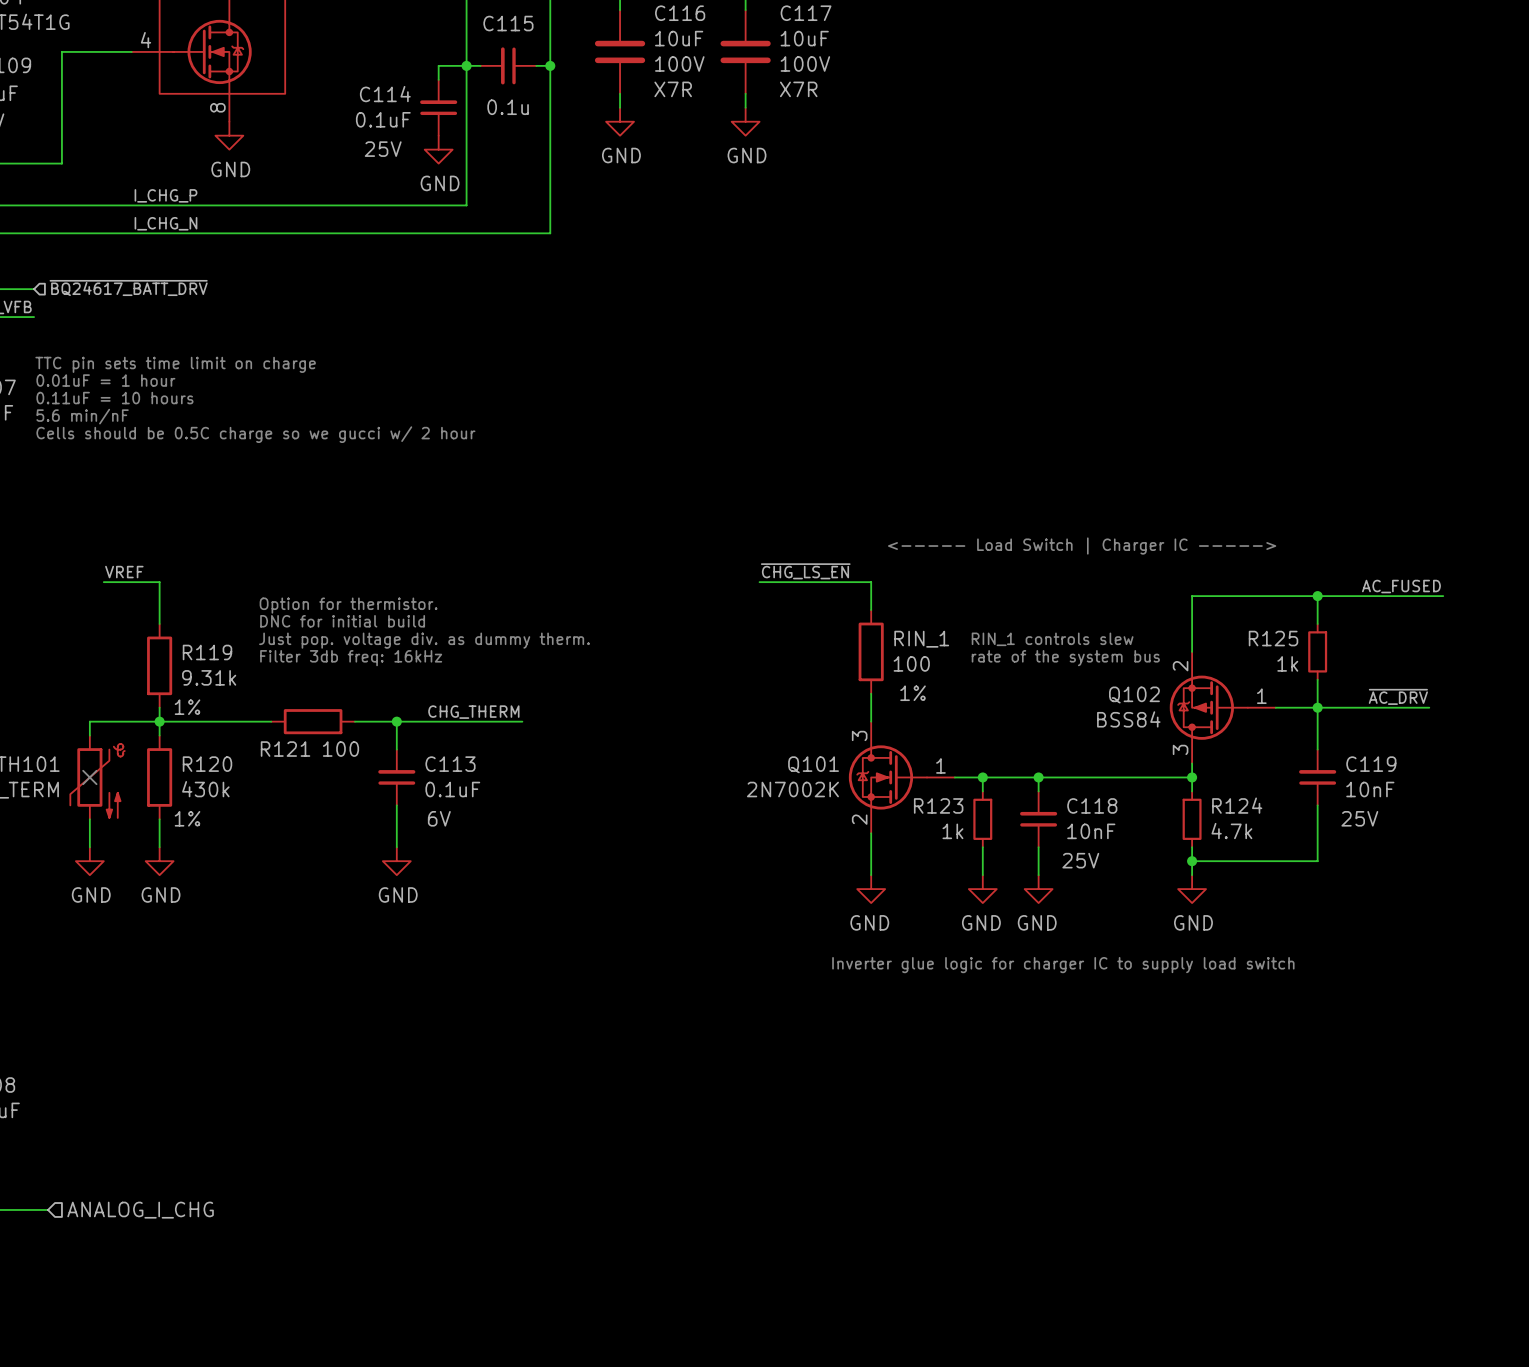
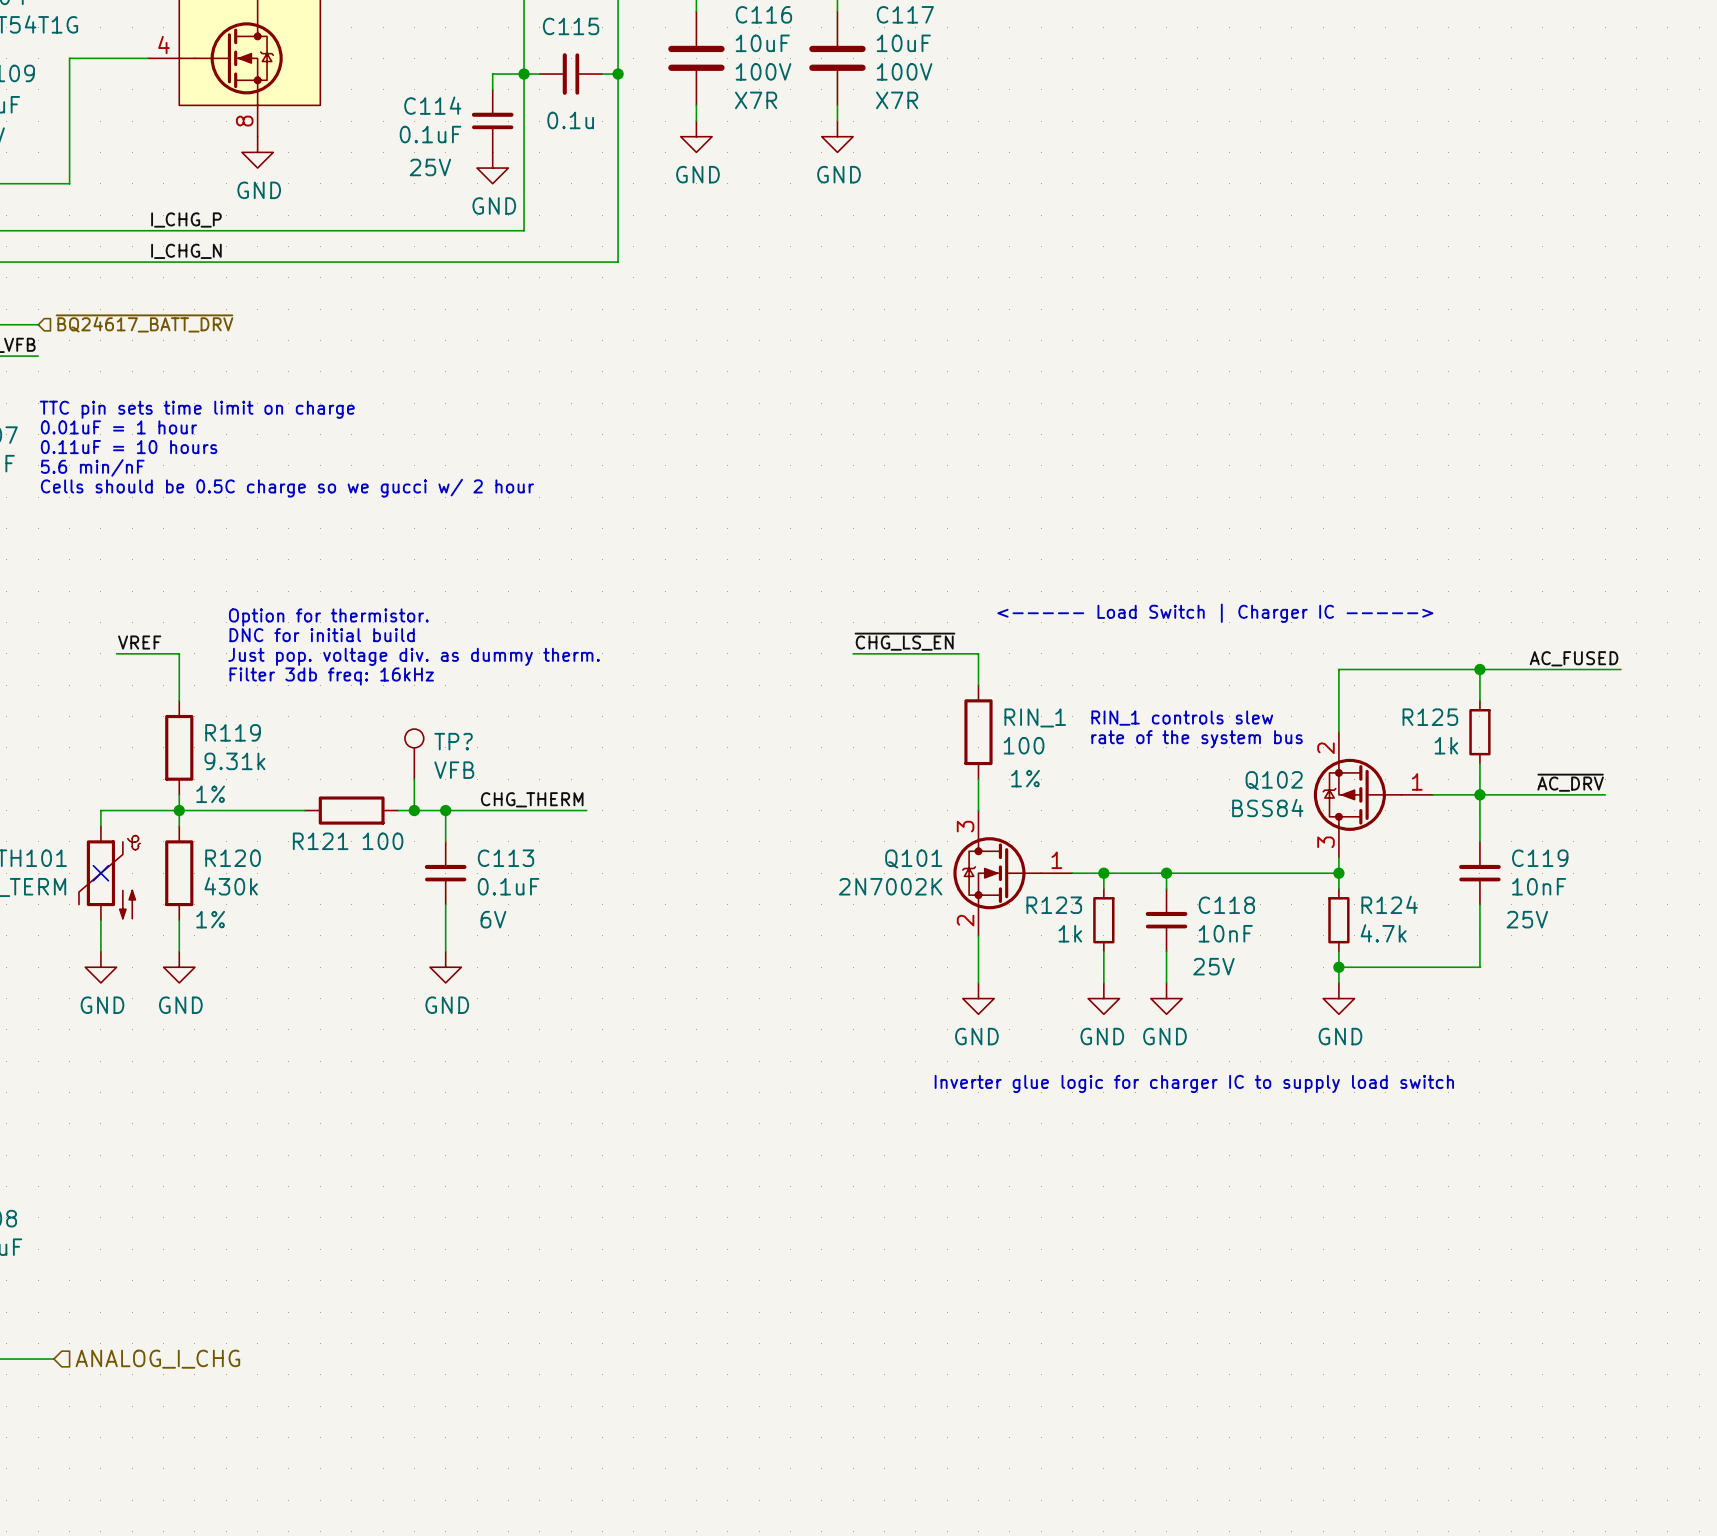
text position: Option for thermistor. (348, 605) -> Option for thermistor. (328, 617)
text position: DNC for initial build (342, 621) -> DNC for initial build (322, 635)
text position: Just pop. voltage div. as dummy therm. (424, 640) -> Just pop. voltage div. as dummy therm. (414, 656)
text position: Filter 3db freq: 16kHz (351, 658) -> Filter 3db freq: 16kHz (331, 676)
TP?: none -> VFB (414, 754)
wire: none -> (414, 779) (414, 810)
junction: none -> (414, 810)

